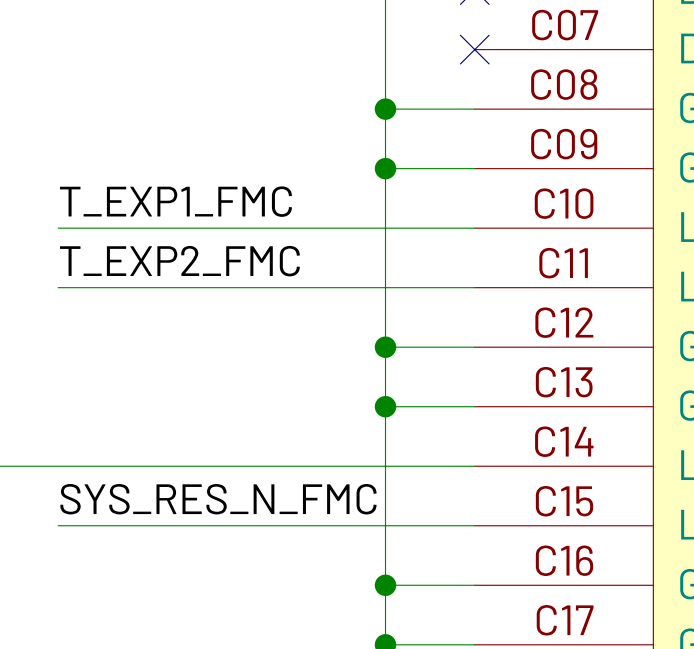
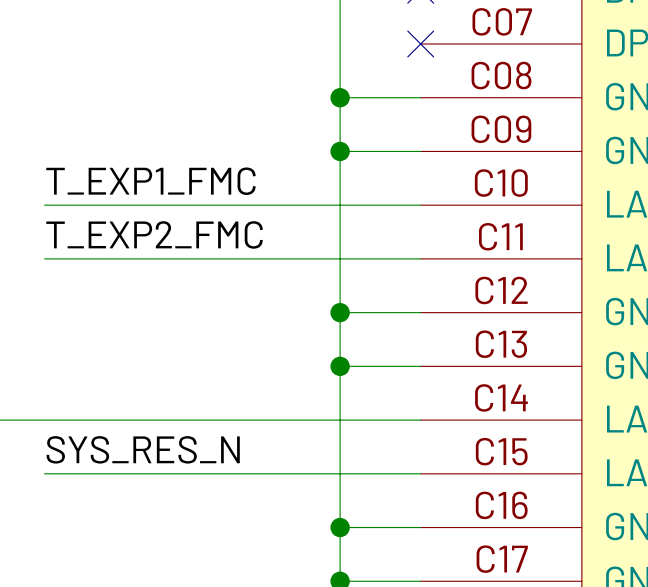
label: SYS_RES_N_FMC (218, 499) -> SYS_RES_N (143, 449)

